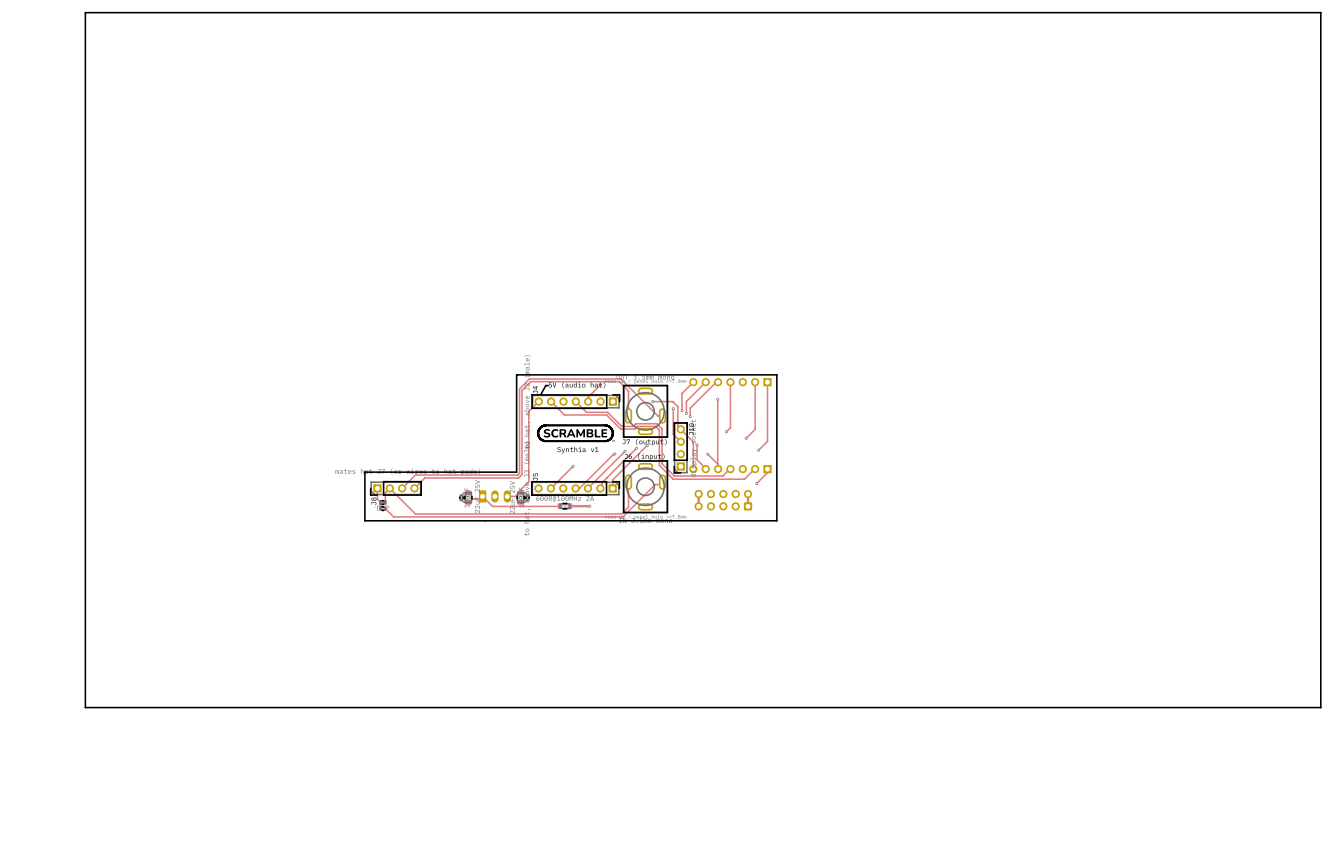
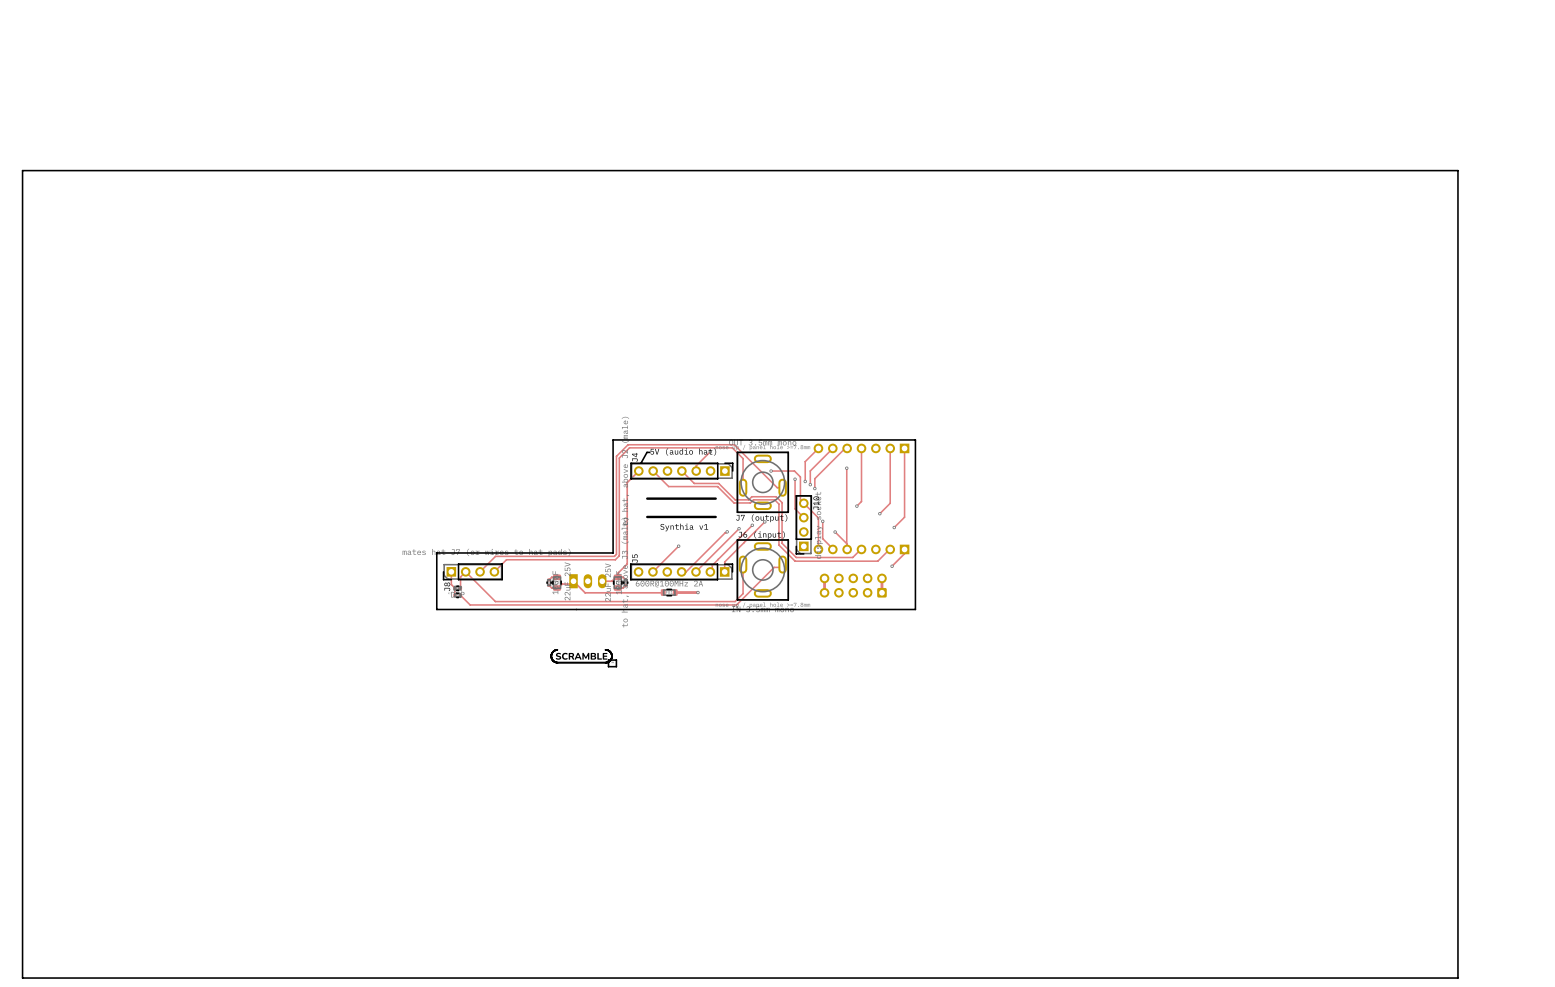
line: (85, 12) (85, 707) (1320, 707) (1320, 12) (85, 12) -> (22, 170) (22, 978) (1457, 978) (1457, 170) (22, 170)
drawing: [543, 429, 615, 442] -> none
drawing: none -> [555, 652, 614, 664]
line: none -> (608, 660) (608, 666) (616, 666) (616, 660) (608, 660)

